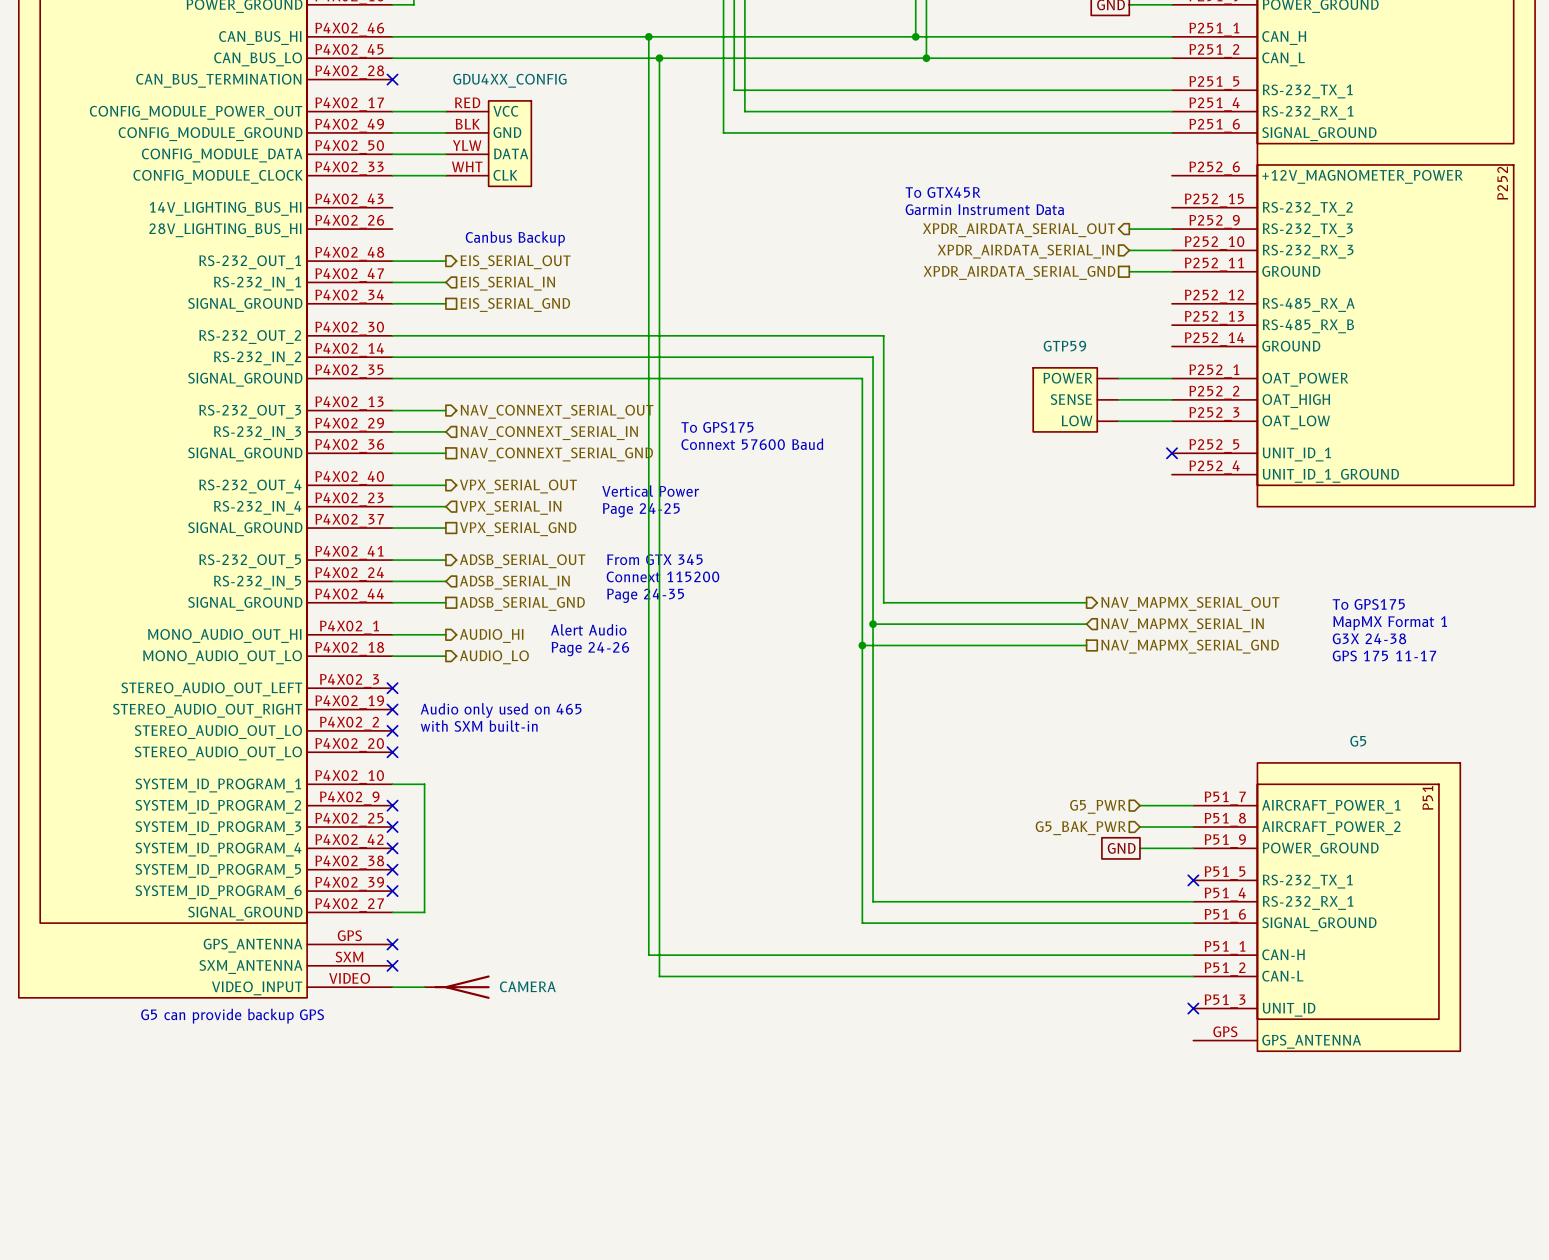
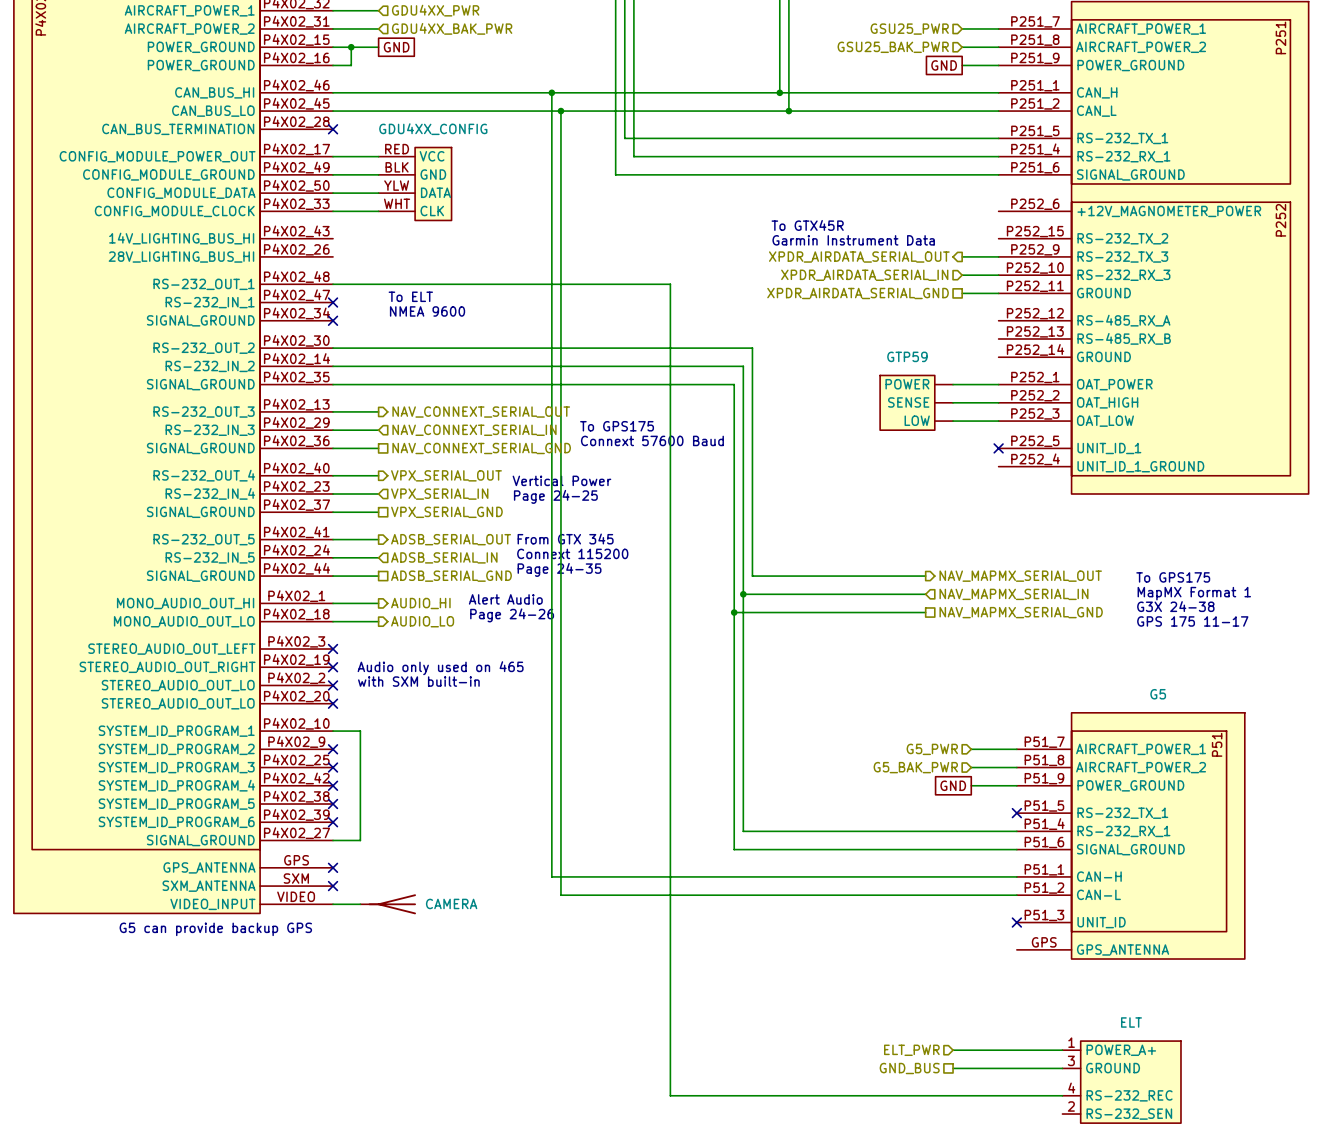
text: Canbus Backup (515, 238) -> none
wire: none -> (378, 284) (670, 284) (670, 1095) (1062, 1095)
hierarchical label: EIS_SERIAL_OUT (515, 262) -> none
text: none -> To ELT (410, 296)
wire: (392, 282) (445, 282) -> none
no-connect mark: none -> (333, 302)
hierarchical label: EIS_SERIAL_IN (507, 283) -> none
text: none -> NMEA 9600 (427, 311)
wire: (392, 303) (445, 303) -> none
no-connect mark: none -> (333, 320)
hierarchical label: EIS_SERIAL_GND (515, 304) -> none
wire: none -> (953, 1050) (1062, 1050)
hierarchical label: none -> ELT_PWR (911, 1050)
wire: none -> (953, 1068) (1062, 1068)
hierarchical label: none -> GND_BUS (909, 1068)
ELT: none -> (1121, 1082)

